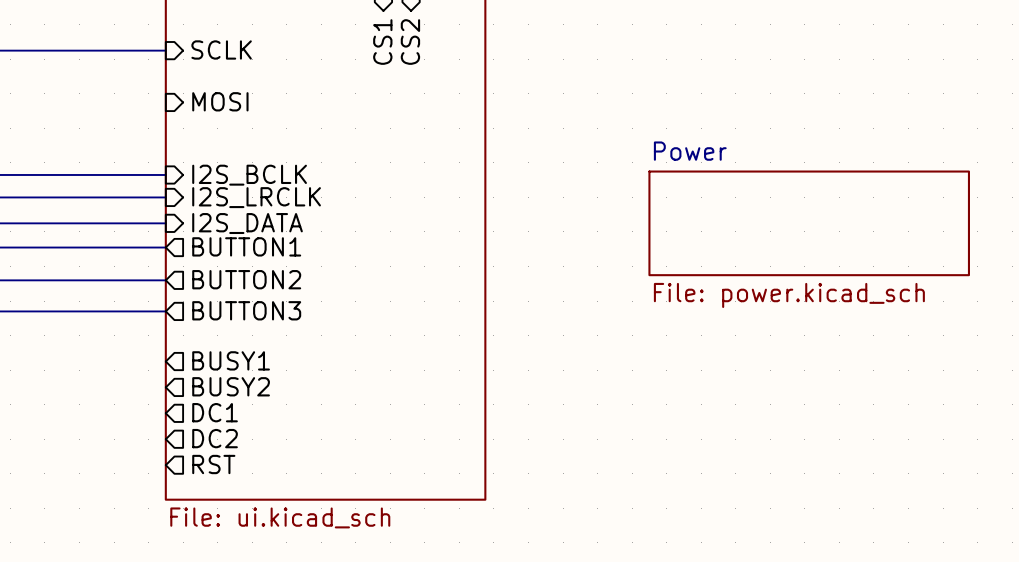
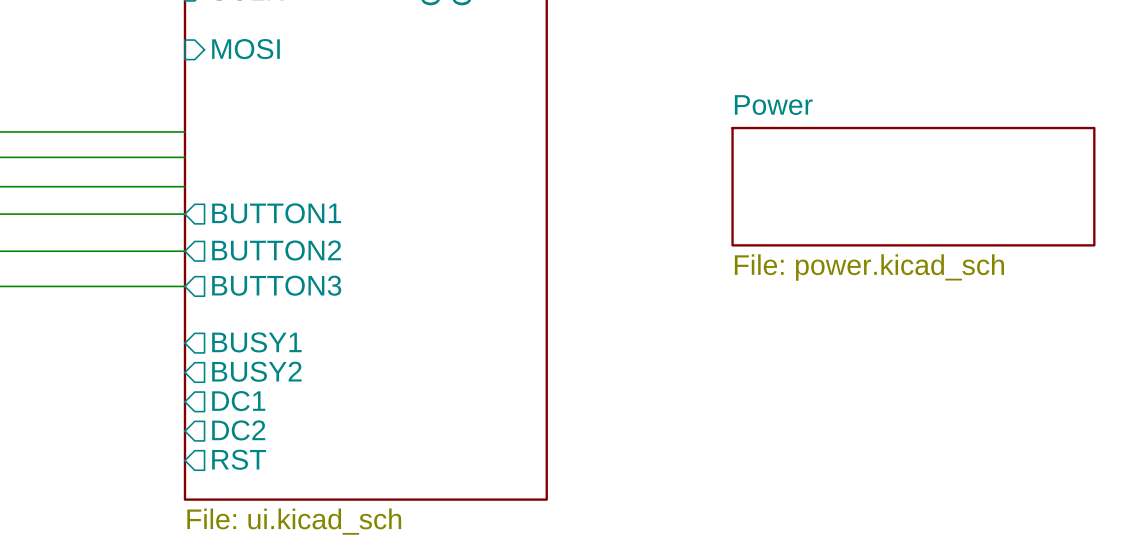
sheet pin: I2S_BCLK (249, 175) -> none
sheet pin: I2S_LRCLK (256, 197) -> none
sheet pin: I2S_DATA (247, 223) -> none

